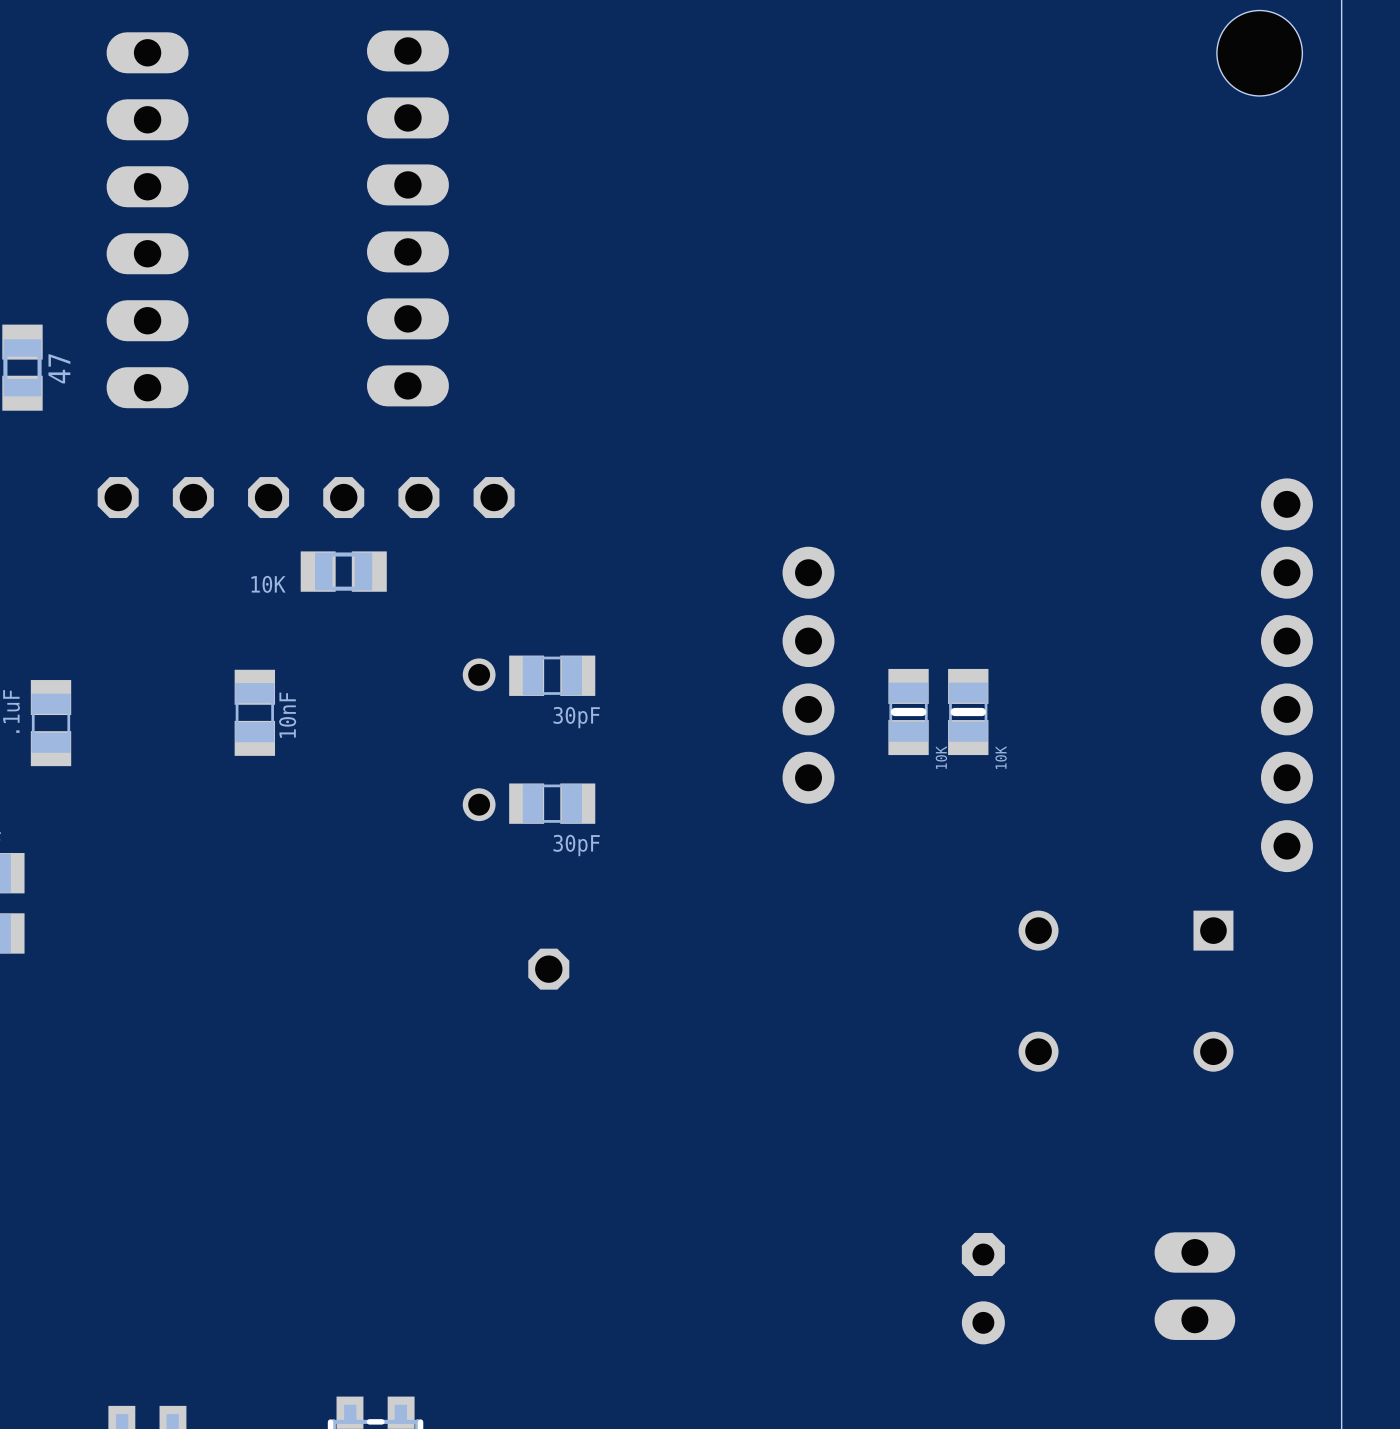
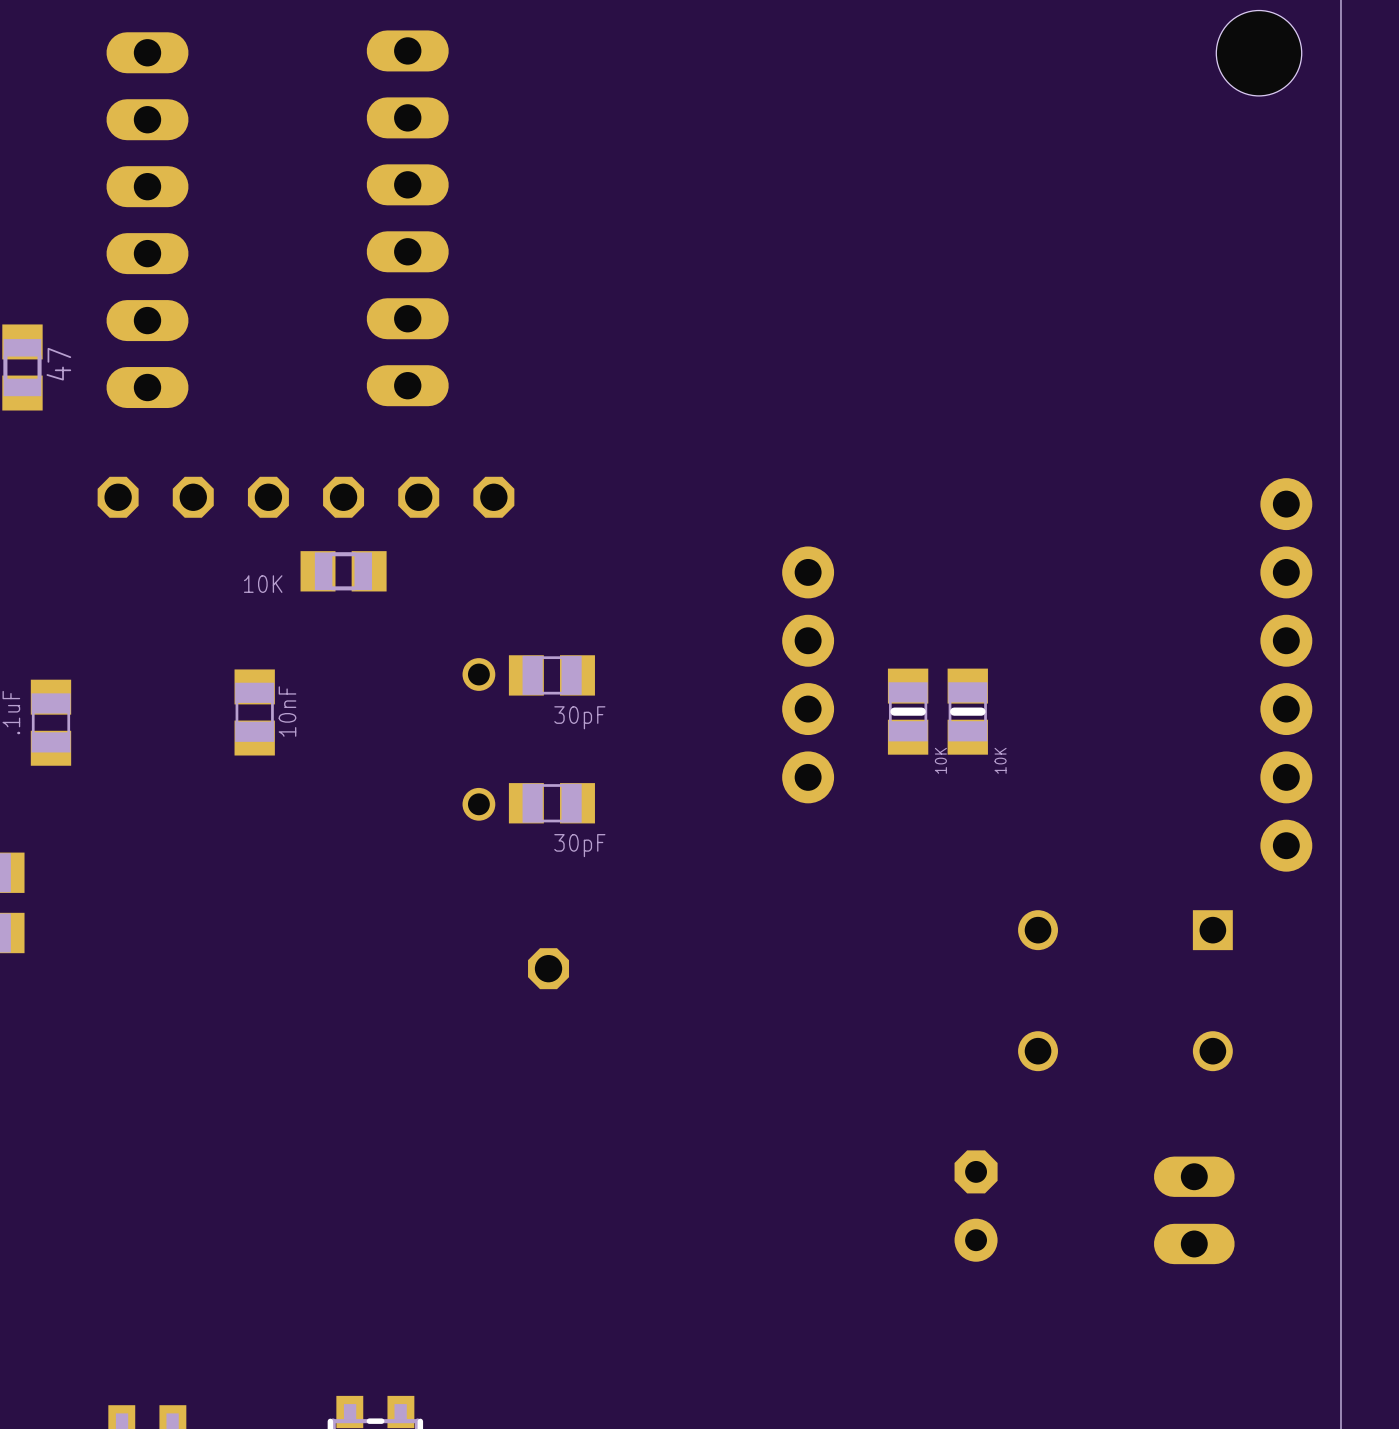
part position: (1194, 1286) -> (1194, 1210)
part position: (983, 1288) -> (976, 1206)

